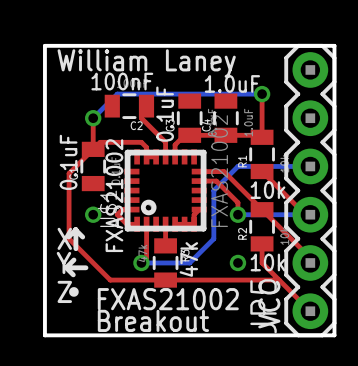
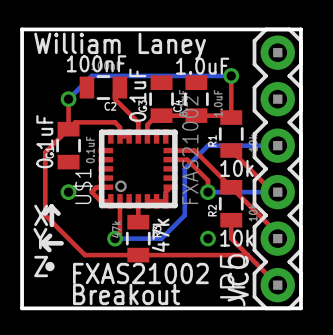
text: FXAS21002 (114, 195) -> none
drawing: [140, 199, 157, 216] -> none

